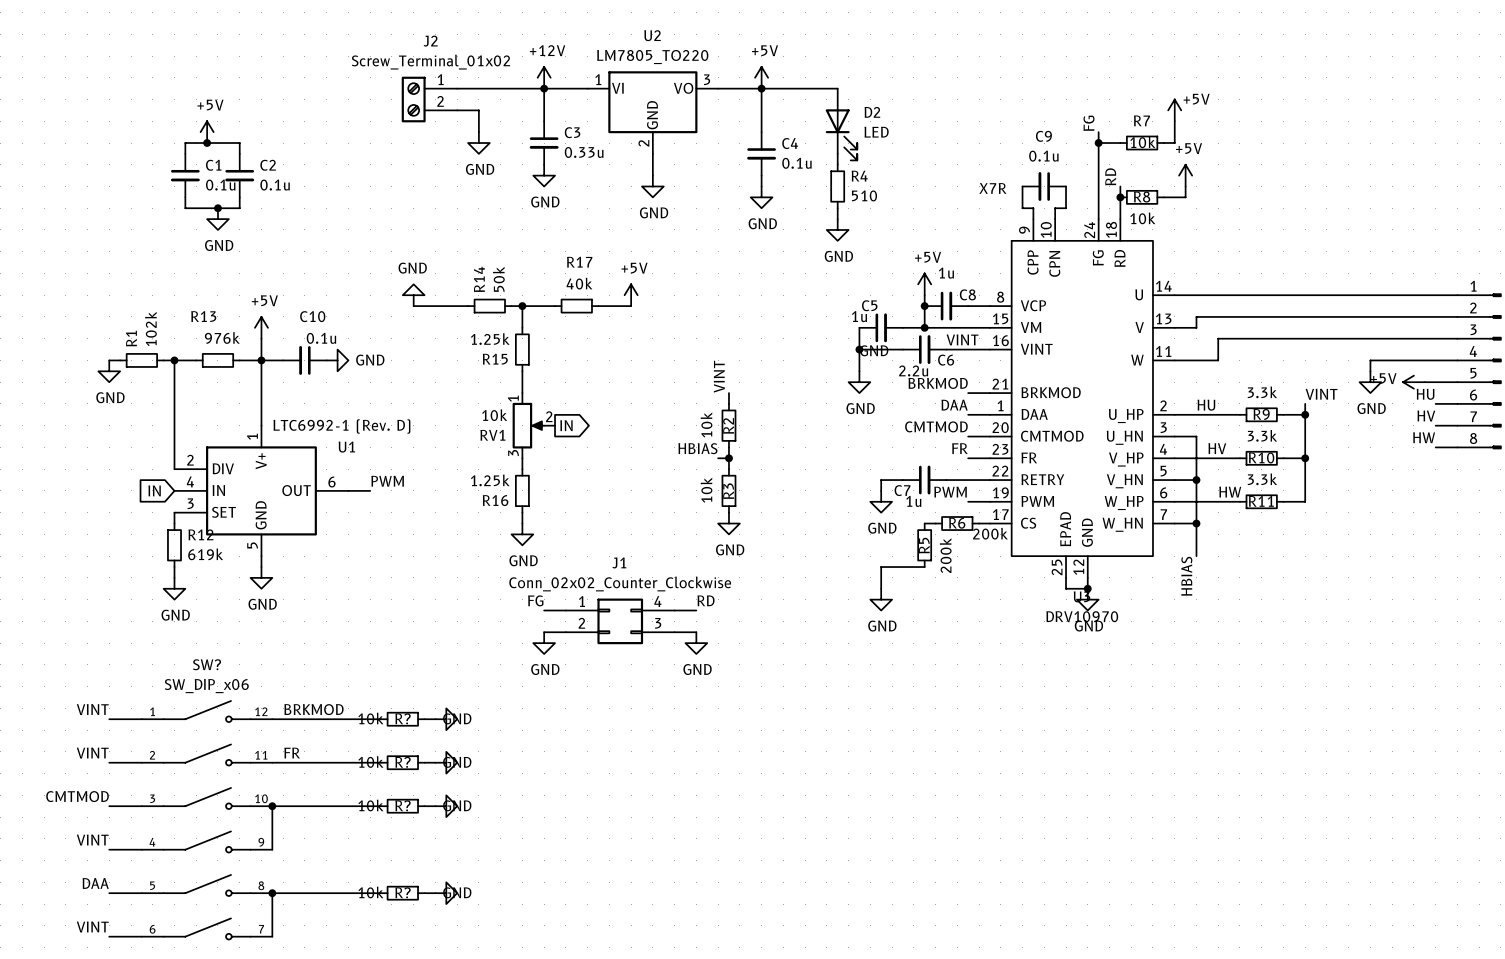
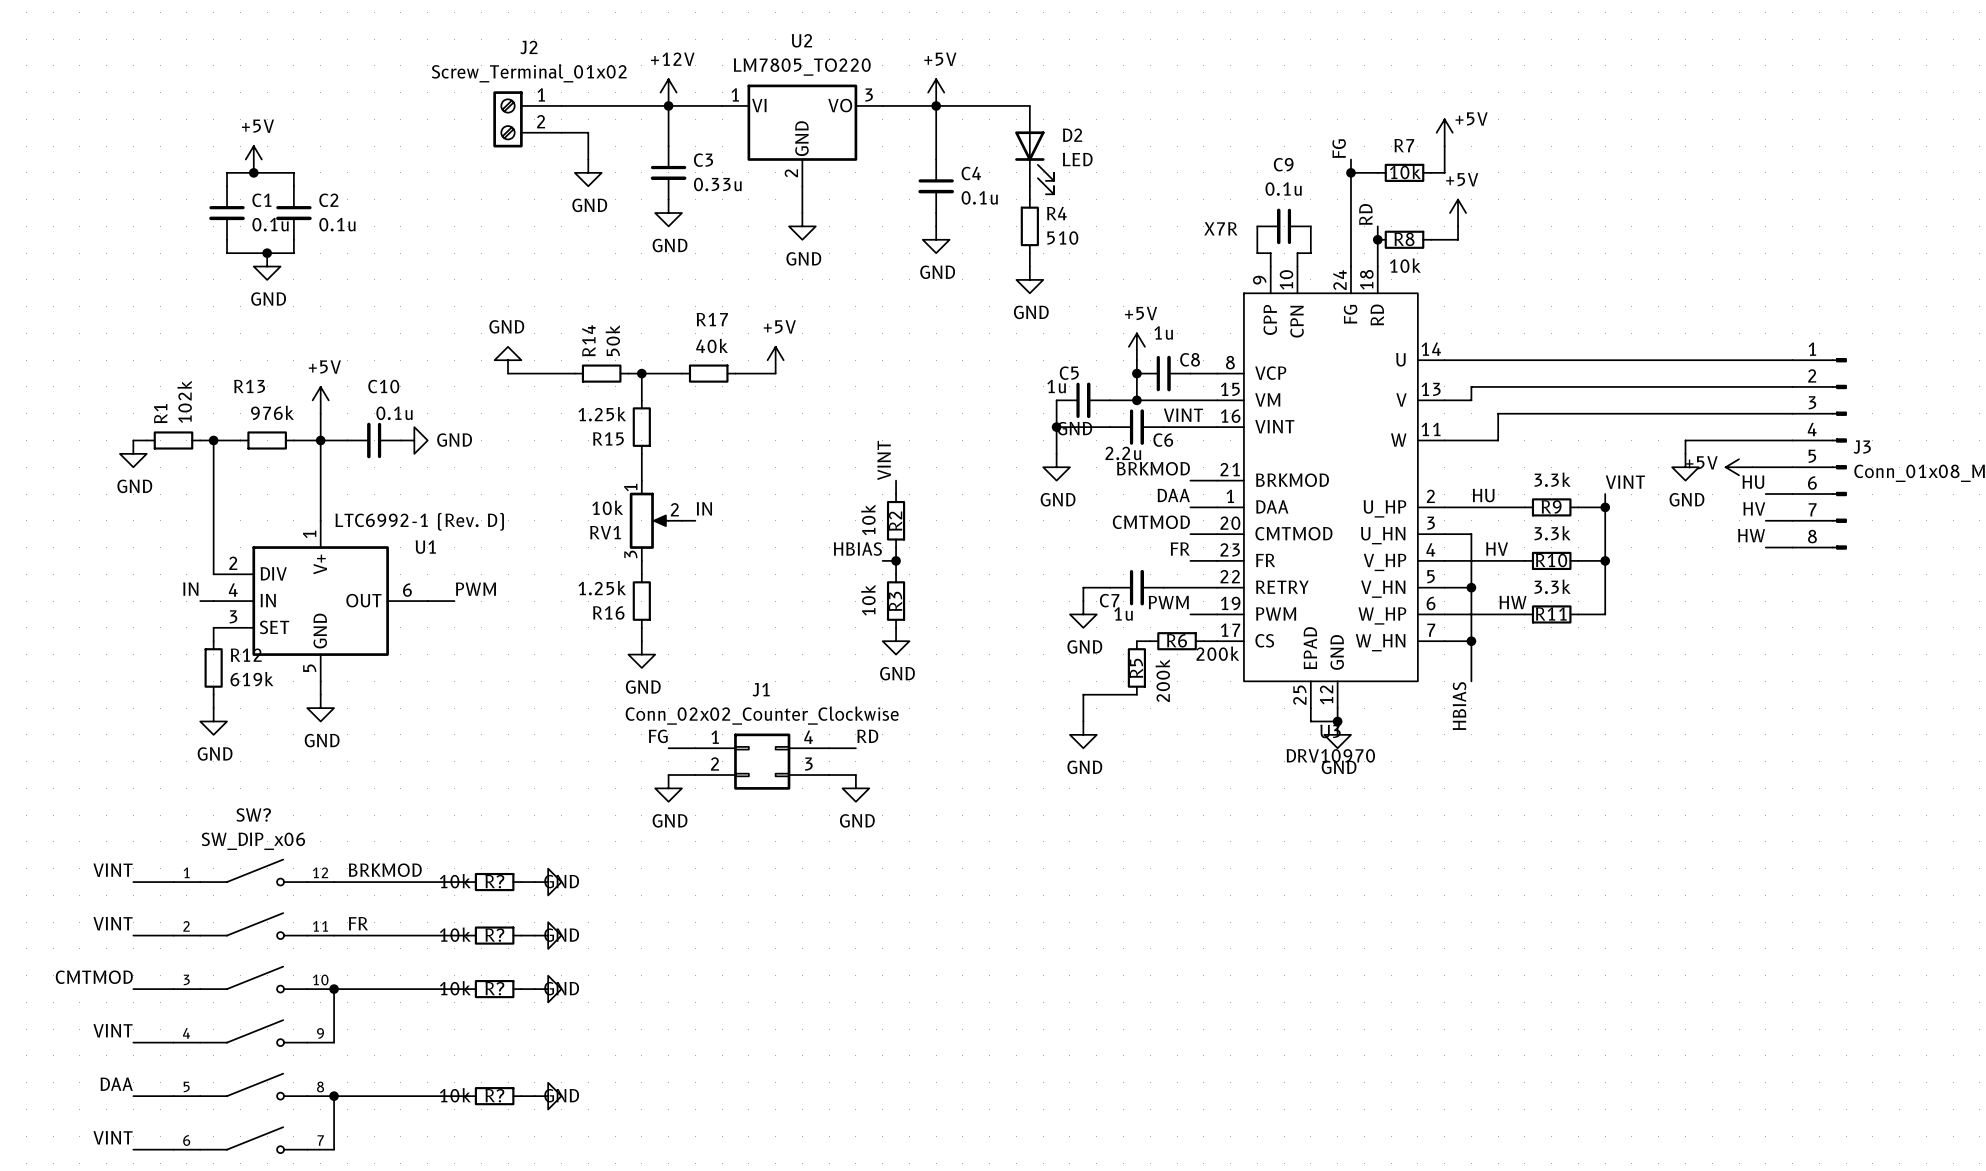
label: none -> IN (704, 508)
wire: none -> (681, 520) (695, 520)
global label: IN (566, 425) -> none
label: none -> IN (190, 589)
global label: IN (154, 490) -> none
wire: none -> (200, 601) (213, 601)

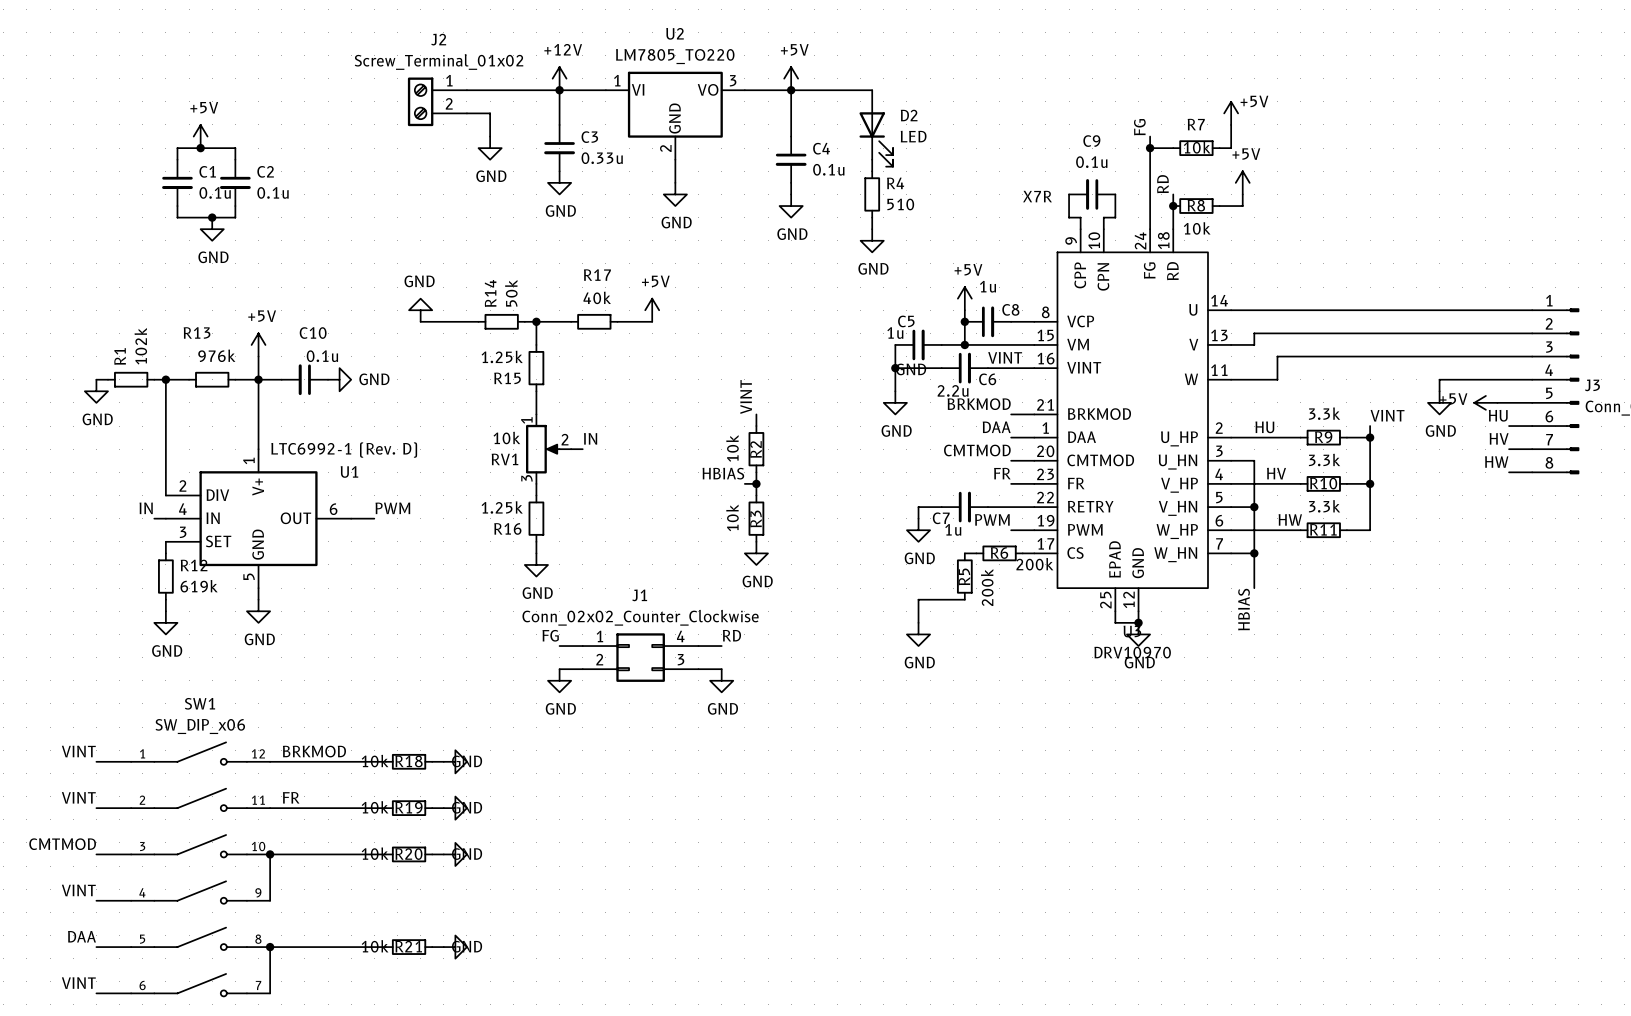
SW? name: SW? (253, 814) -> SW1 (199, 703)
R? name: R? (494, 881) -> R18 (409, 761)
R? name: R? (494, 935) -> R19 (408, 807)
R? name: R? (494, 988) -> R20 (408, 854)
R? name: R? (494, 1095) -> R21 (408, 946)

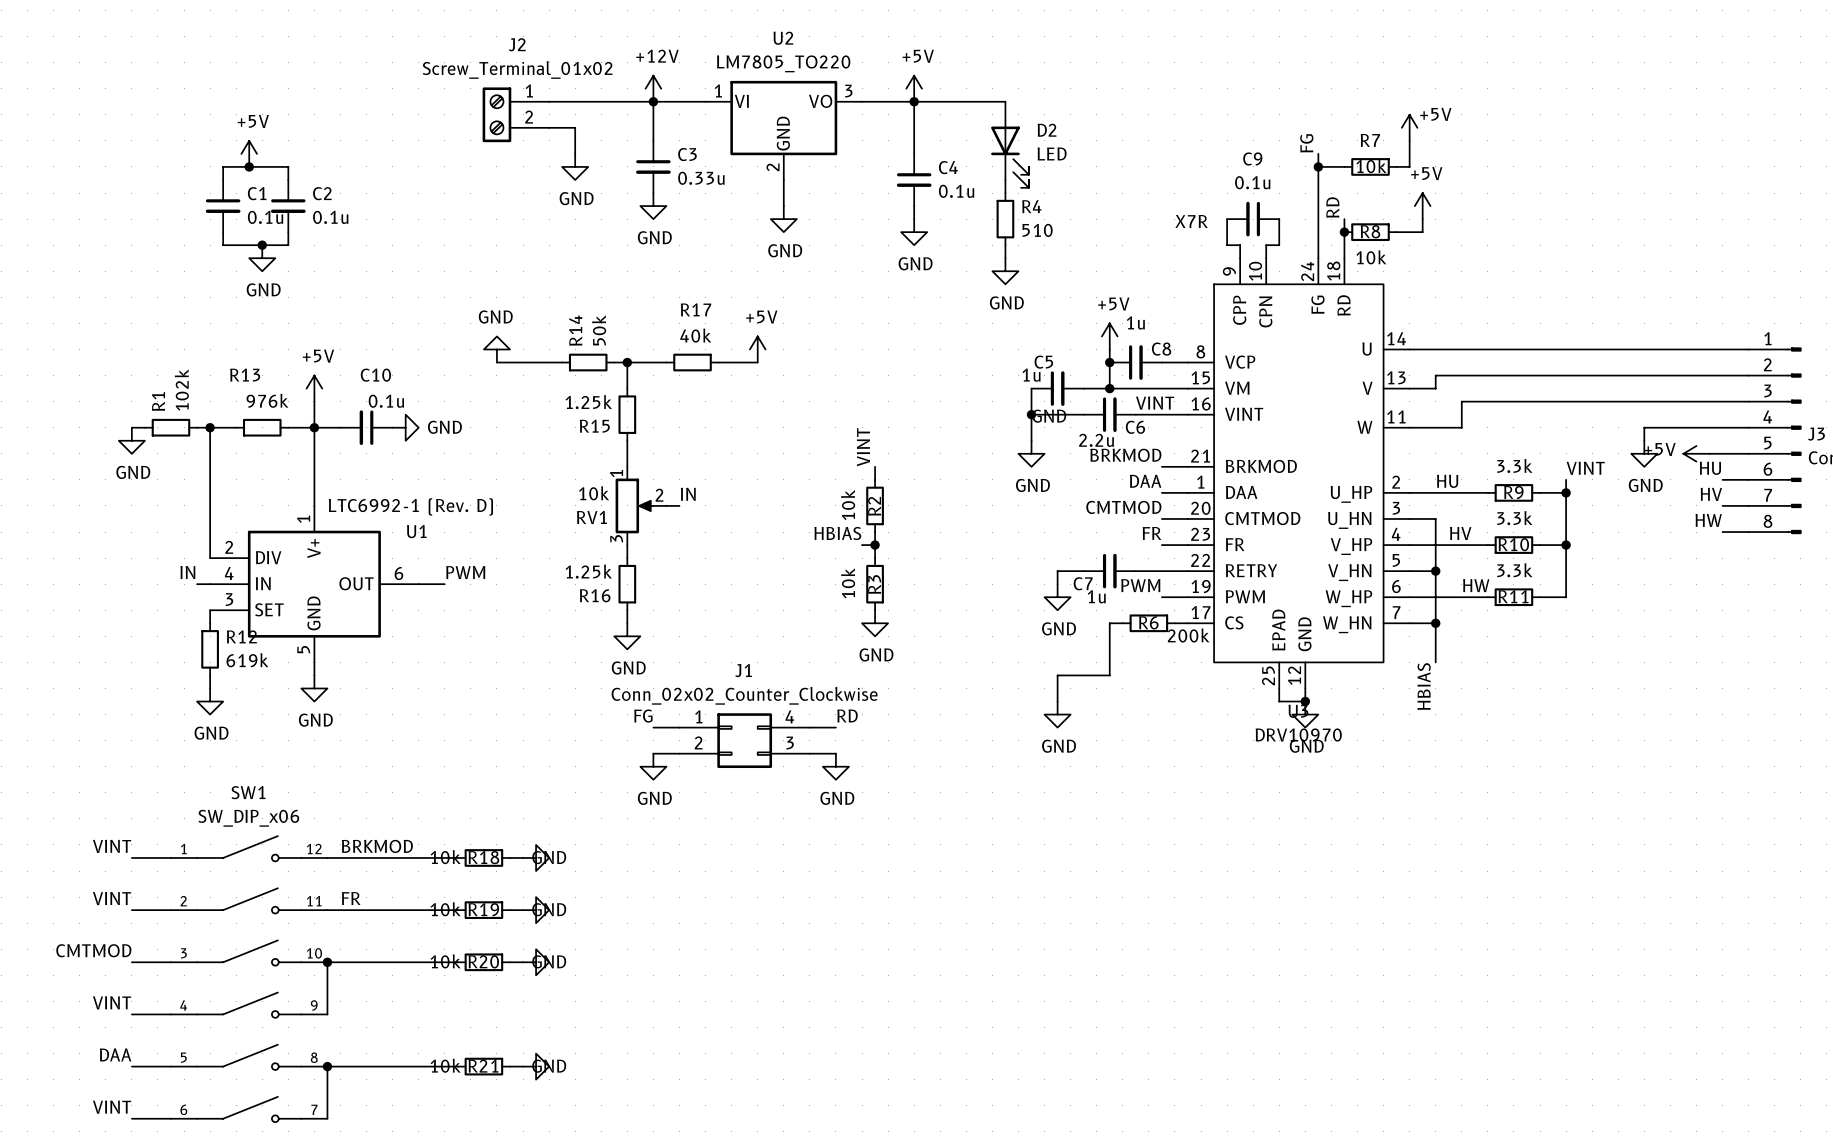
wire: none -> (1109, 623) (1109, 675)
R5: 200k (964, 576) -> none

